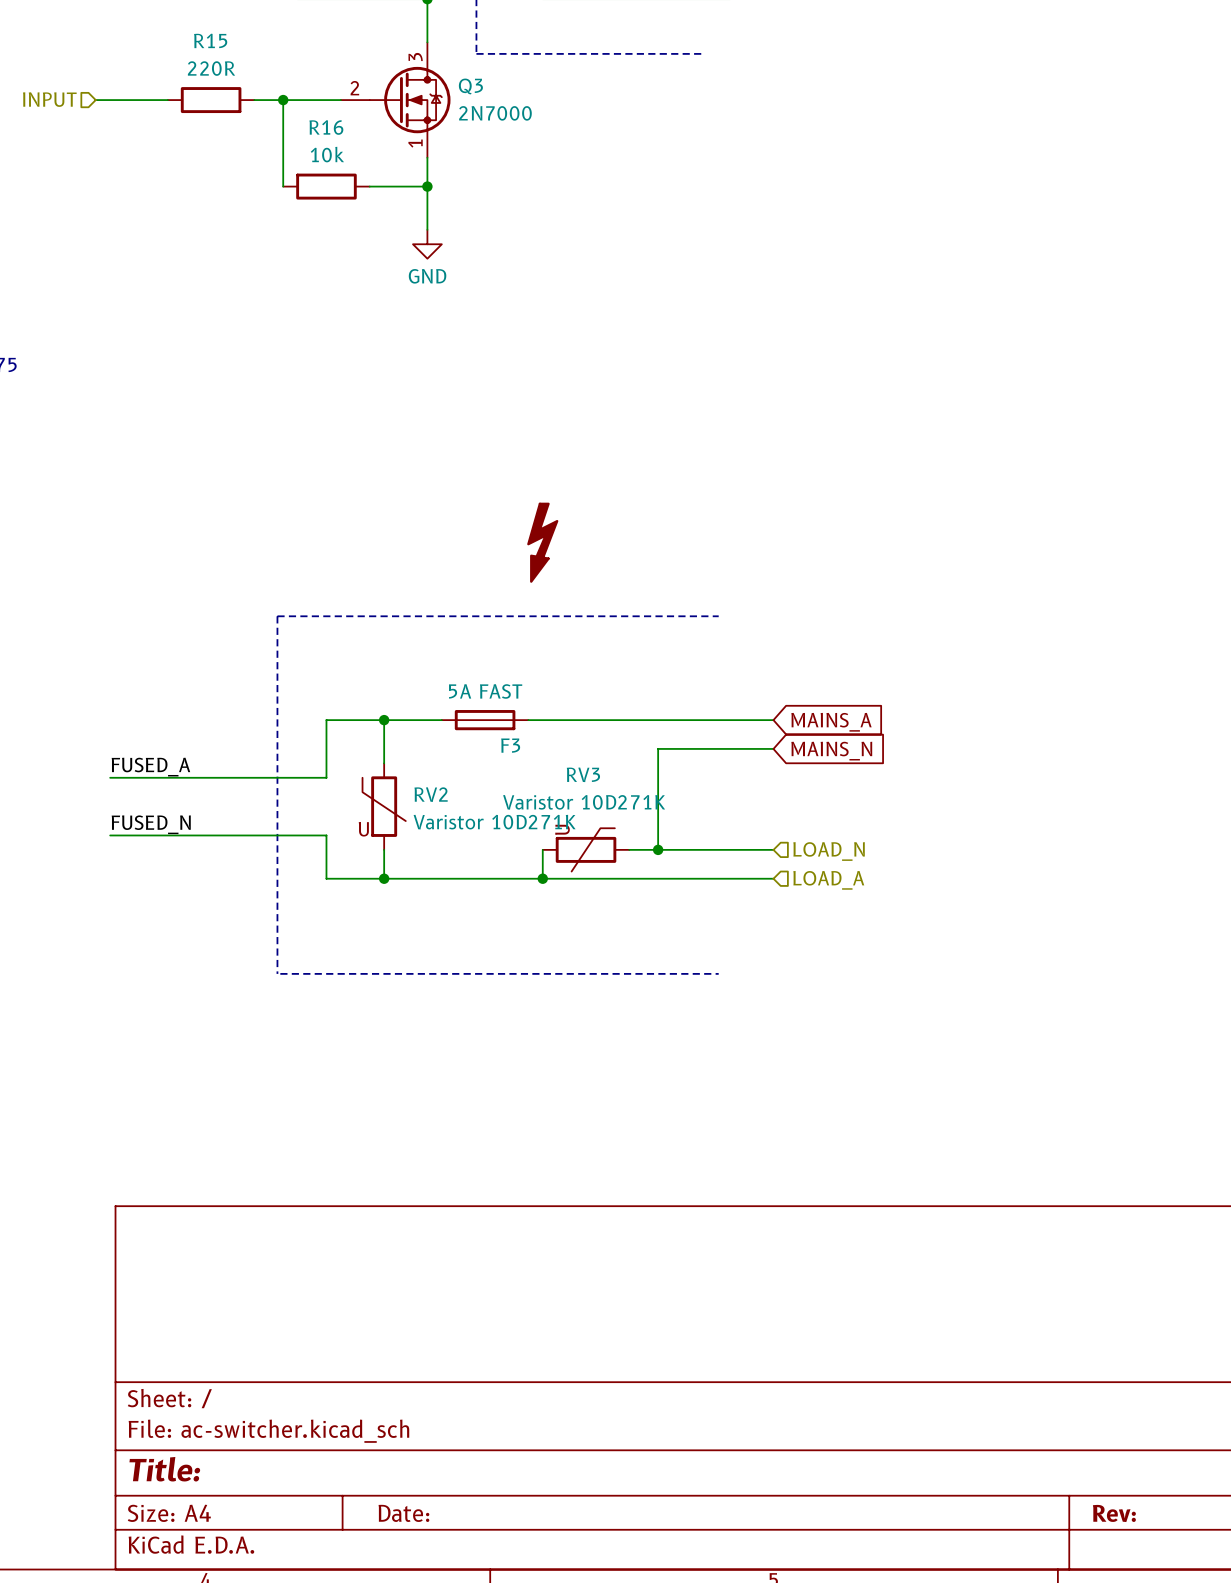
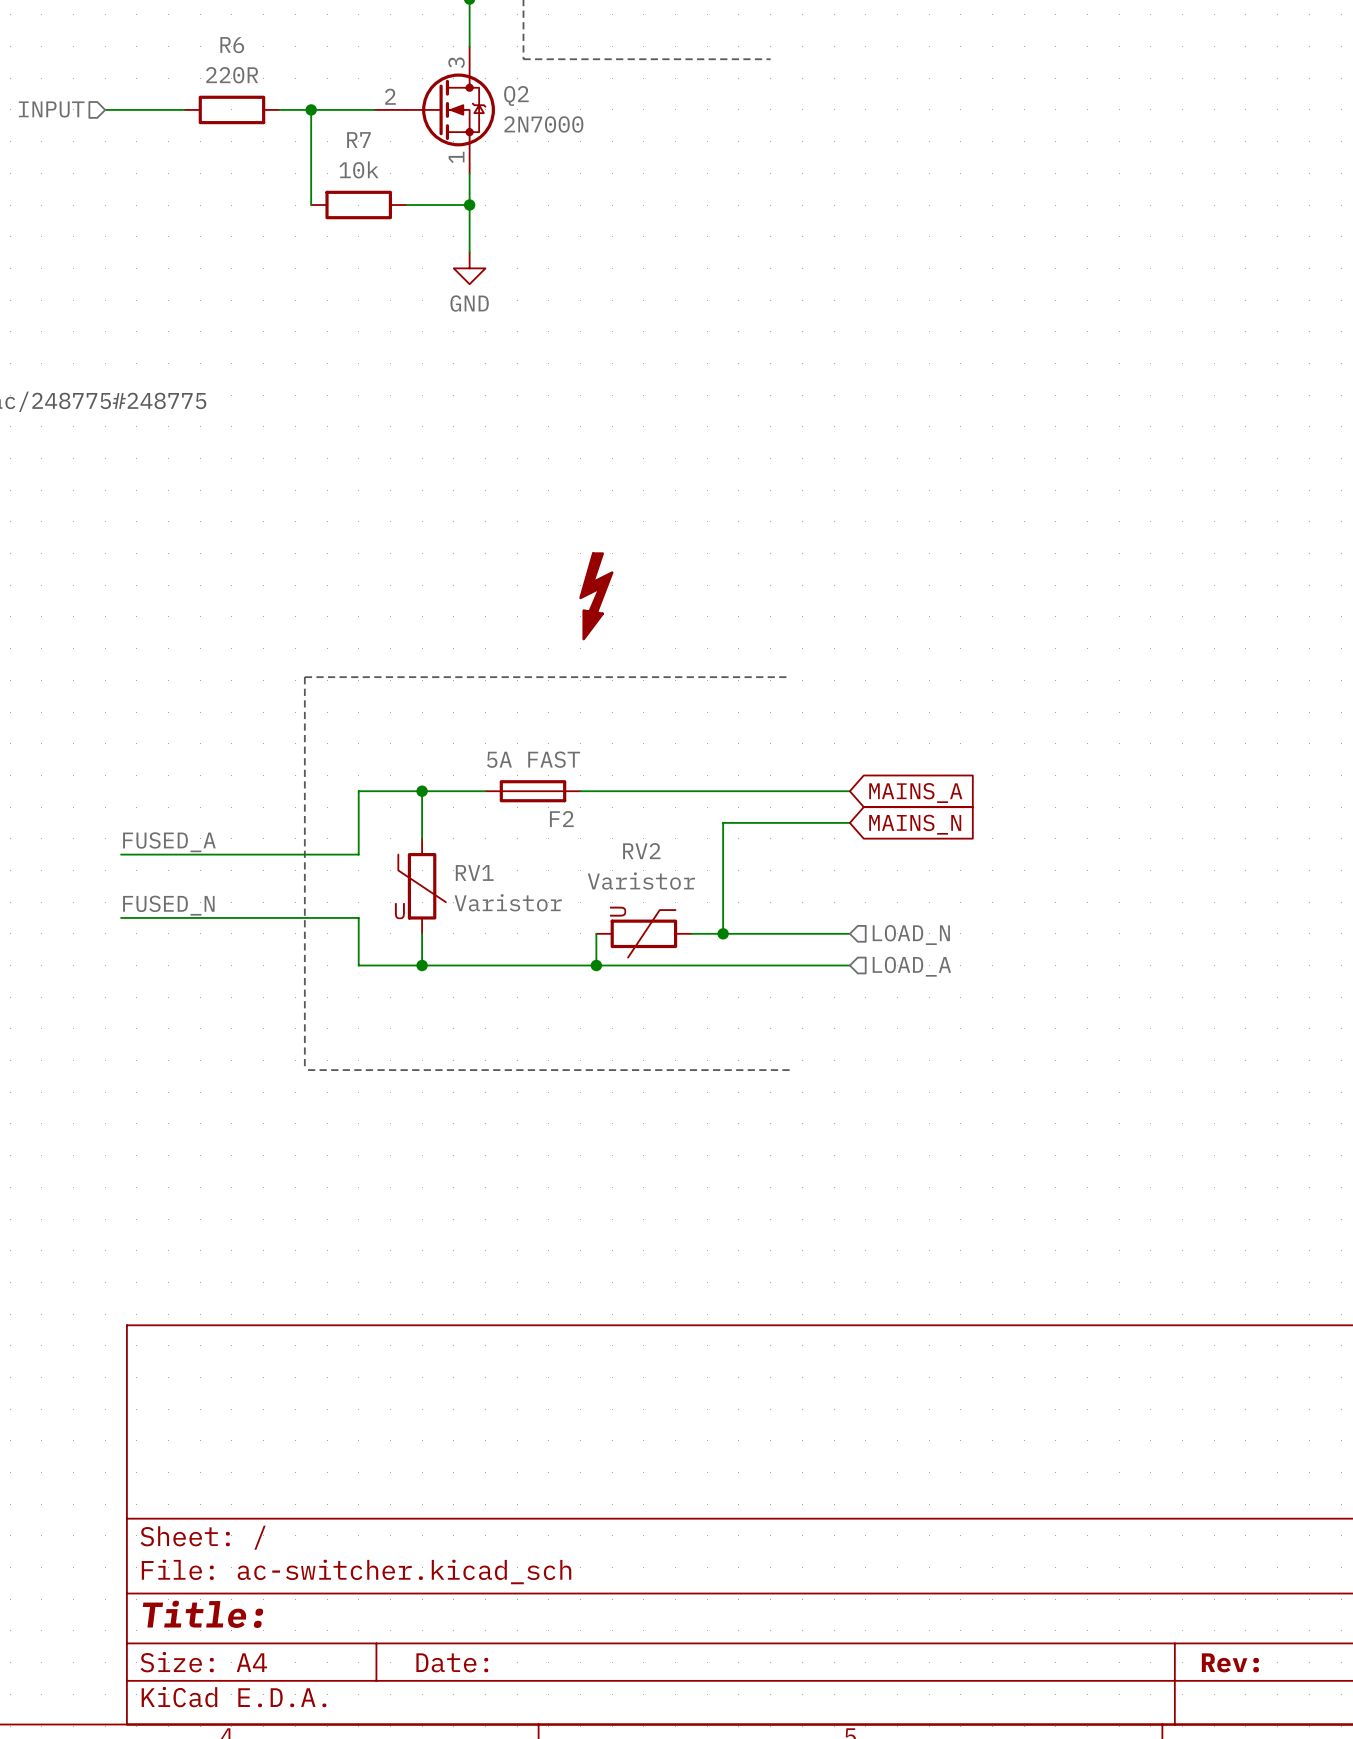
R15 name: R15 (210, 40) -> R6 (232, 45)
Q3 name: Q3 (470, 86) -> Q2 (516, 95)
R16 name: R16 (326, 127) -> R7 (358, 140)
F3 name: F3 (510, 745) -> F2 (561, 819)
RV3 name: RV3 (583, 774) -> RV2 (641, 851)
RV2 name: RV2 (431, 794) -> RV1 (474, 872)
RV3 value: Varistor 10D271K (584, 802) -> Varistor (641, 881)
RV2 value: Varistor 10D271K (494, 822) -> Varistor (508, 902)

